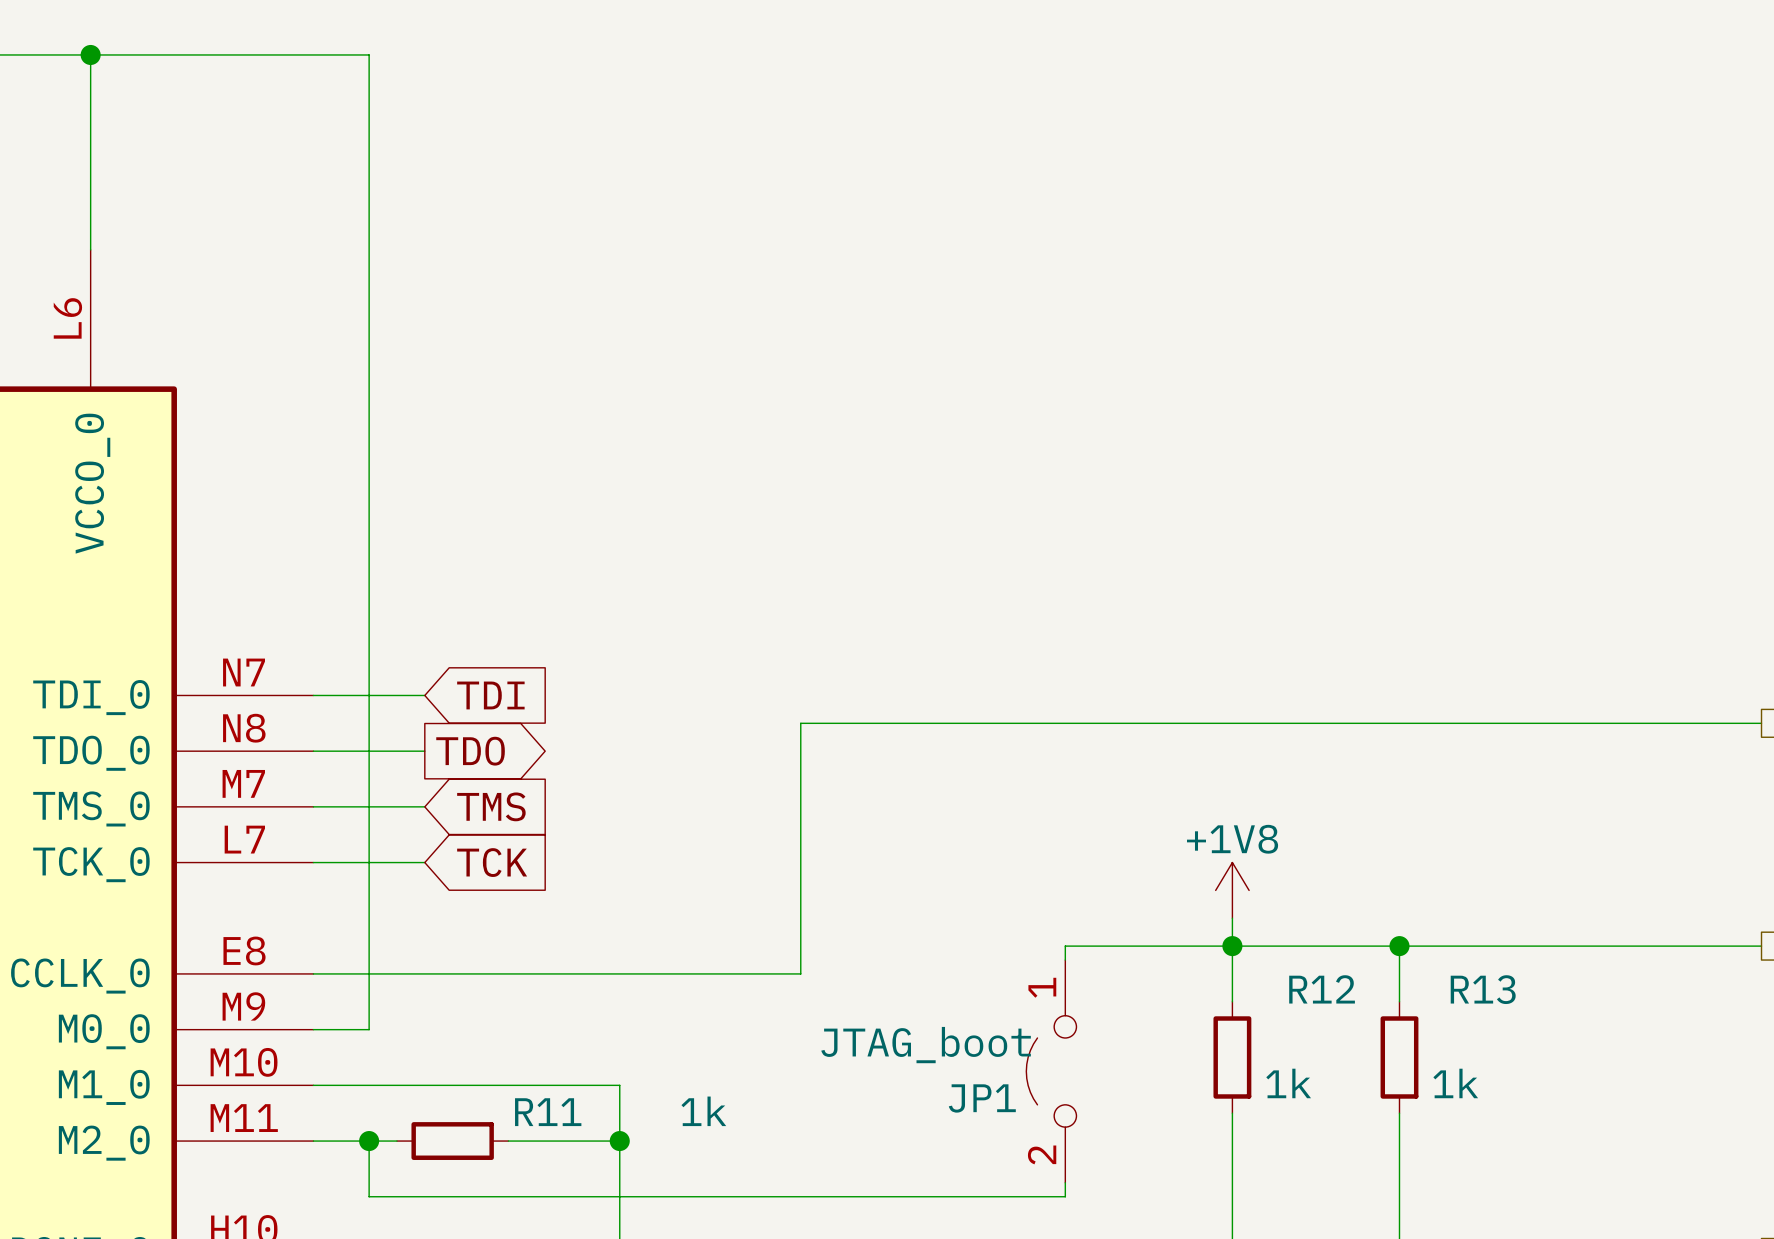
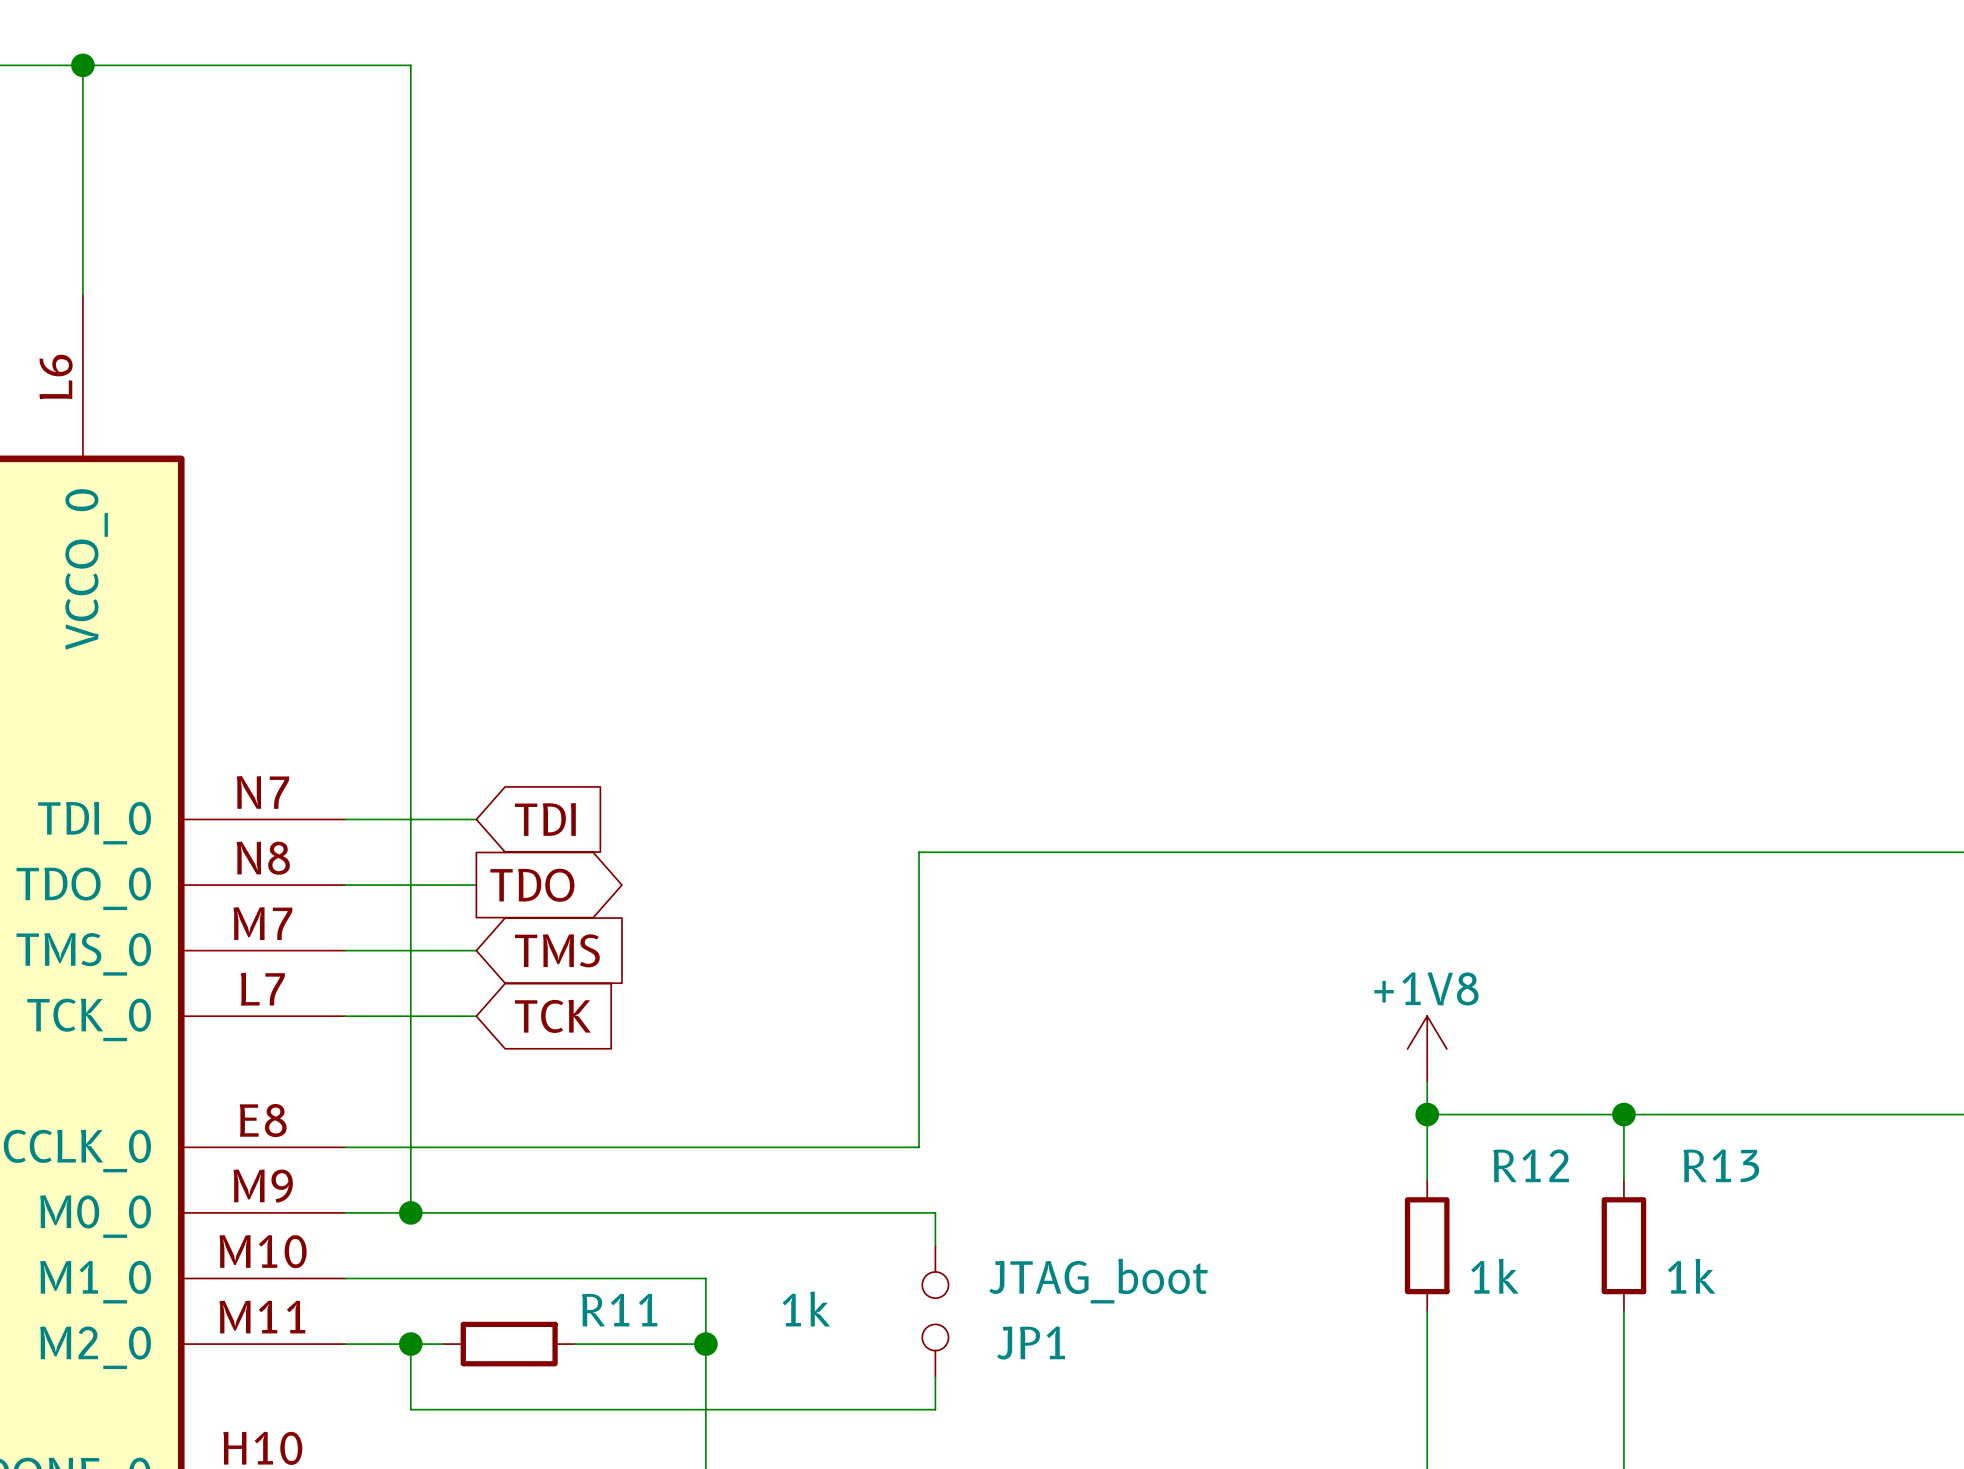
wire: (1232, 946) (1065, 946) (1065, 960) -> none
JP1 symbol: [1026, 960, 1077, 1183] -> [922, 1245, 949, 1377]
wire: none -> (410, 1212) (935, 1212) (935, 1245)
junction: none -> (410, 1212)
JP1 value position: JTAG_boot (926, 1045) -> JTAG_boot (1098, 1281)
JP1 name position: JP1 (982, 1098) -> JP1 (1031, 1343)
wire: (1065, 1182) (1065, 1196) (814, 1196) -> (935, 1376) (935, 1409)

